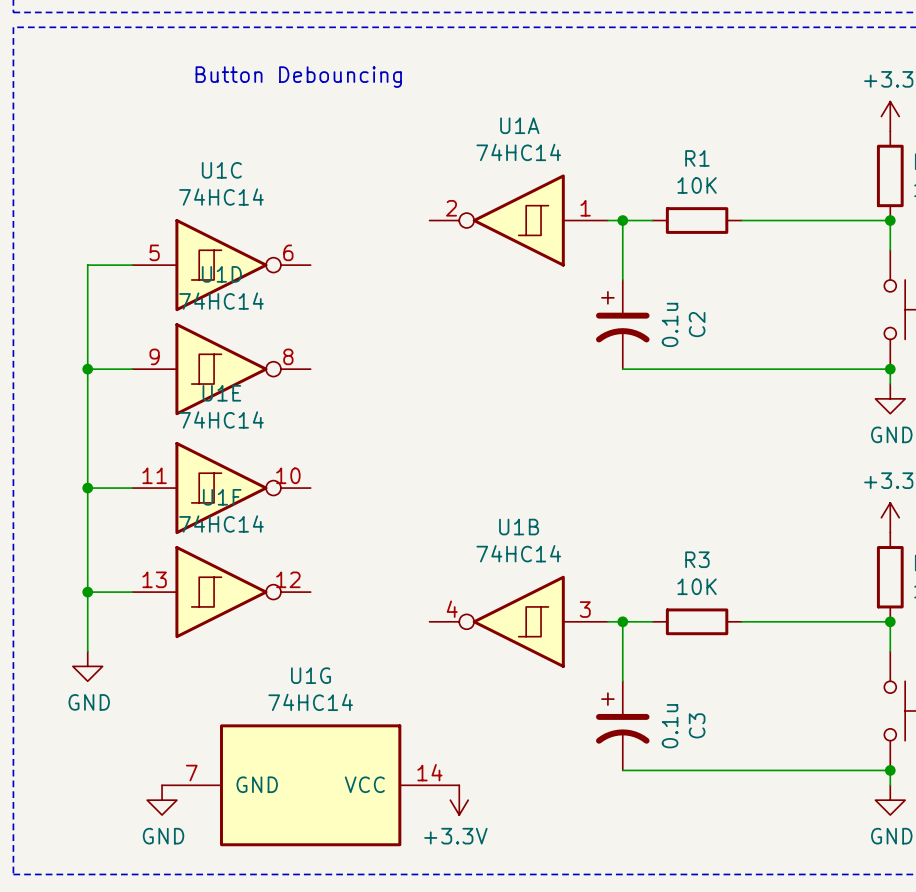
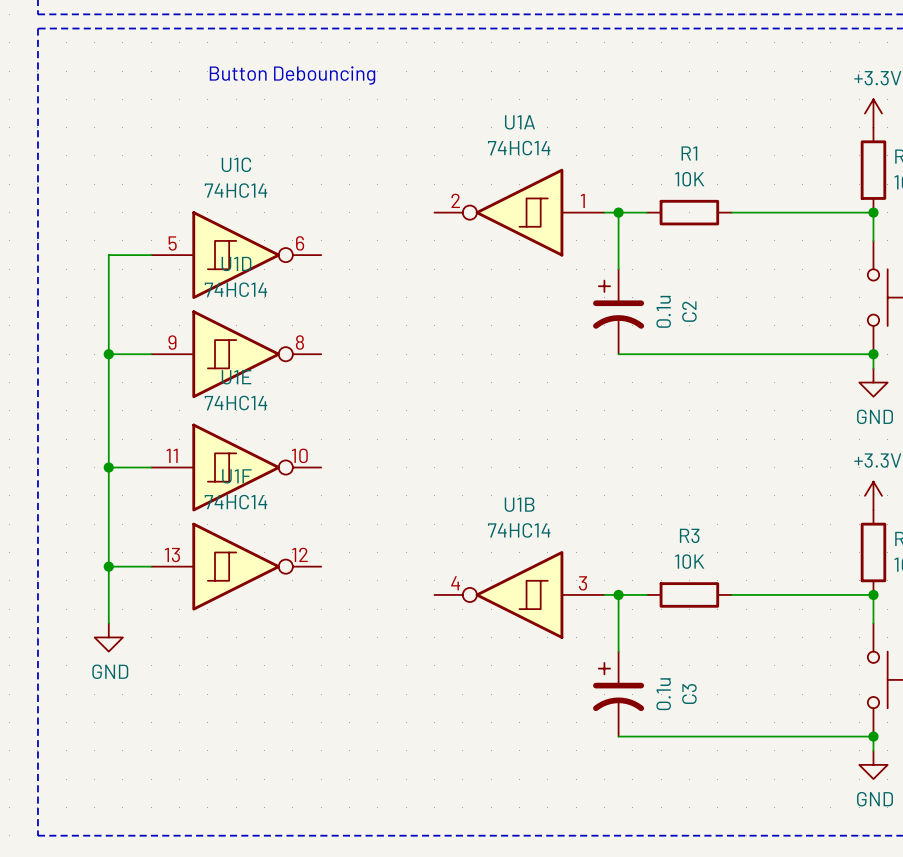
U1G: 74HC14 (310, 785) -> none
power symbol: GND (162, 800) -> none
power symbol: +3.3V (459, 800) -> none

